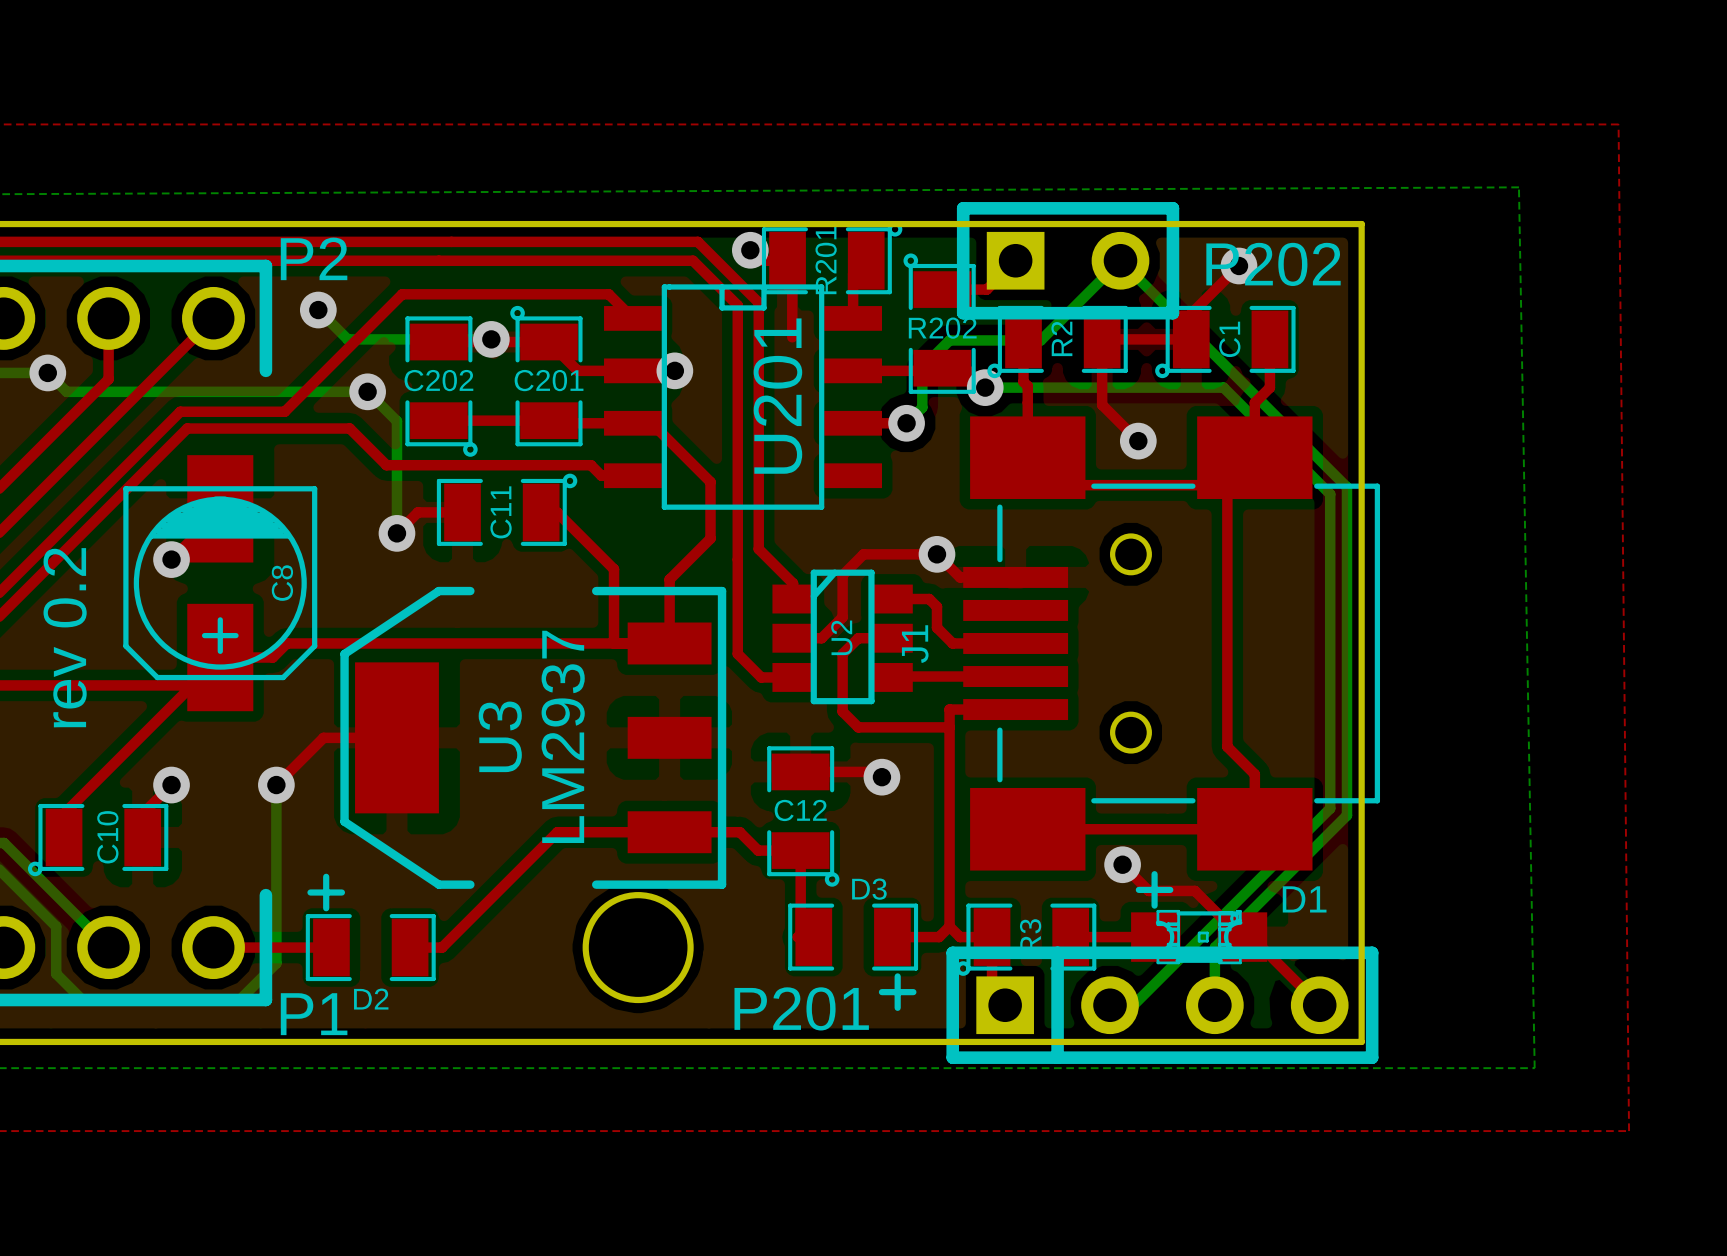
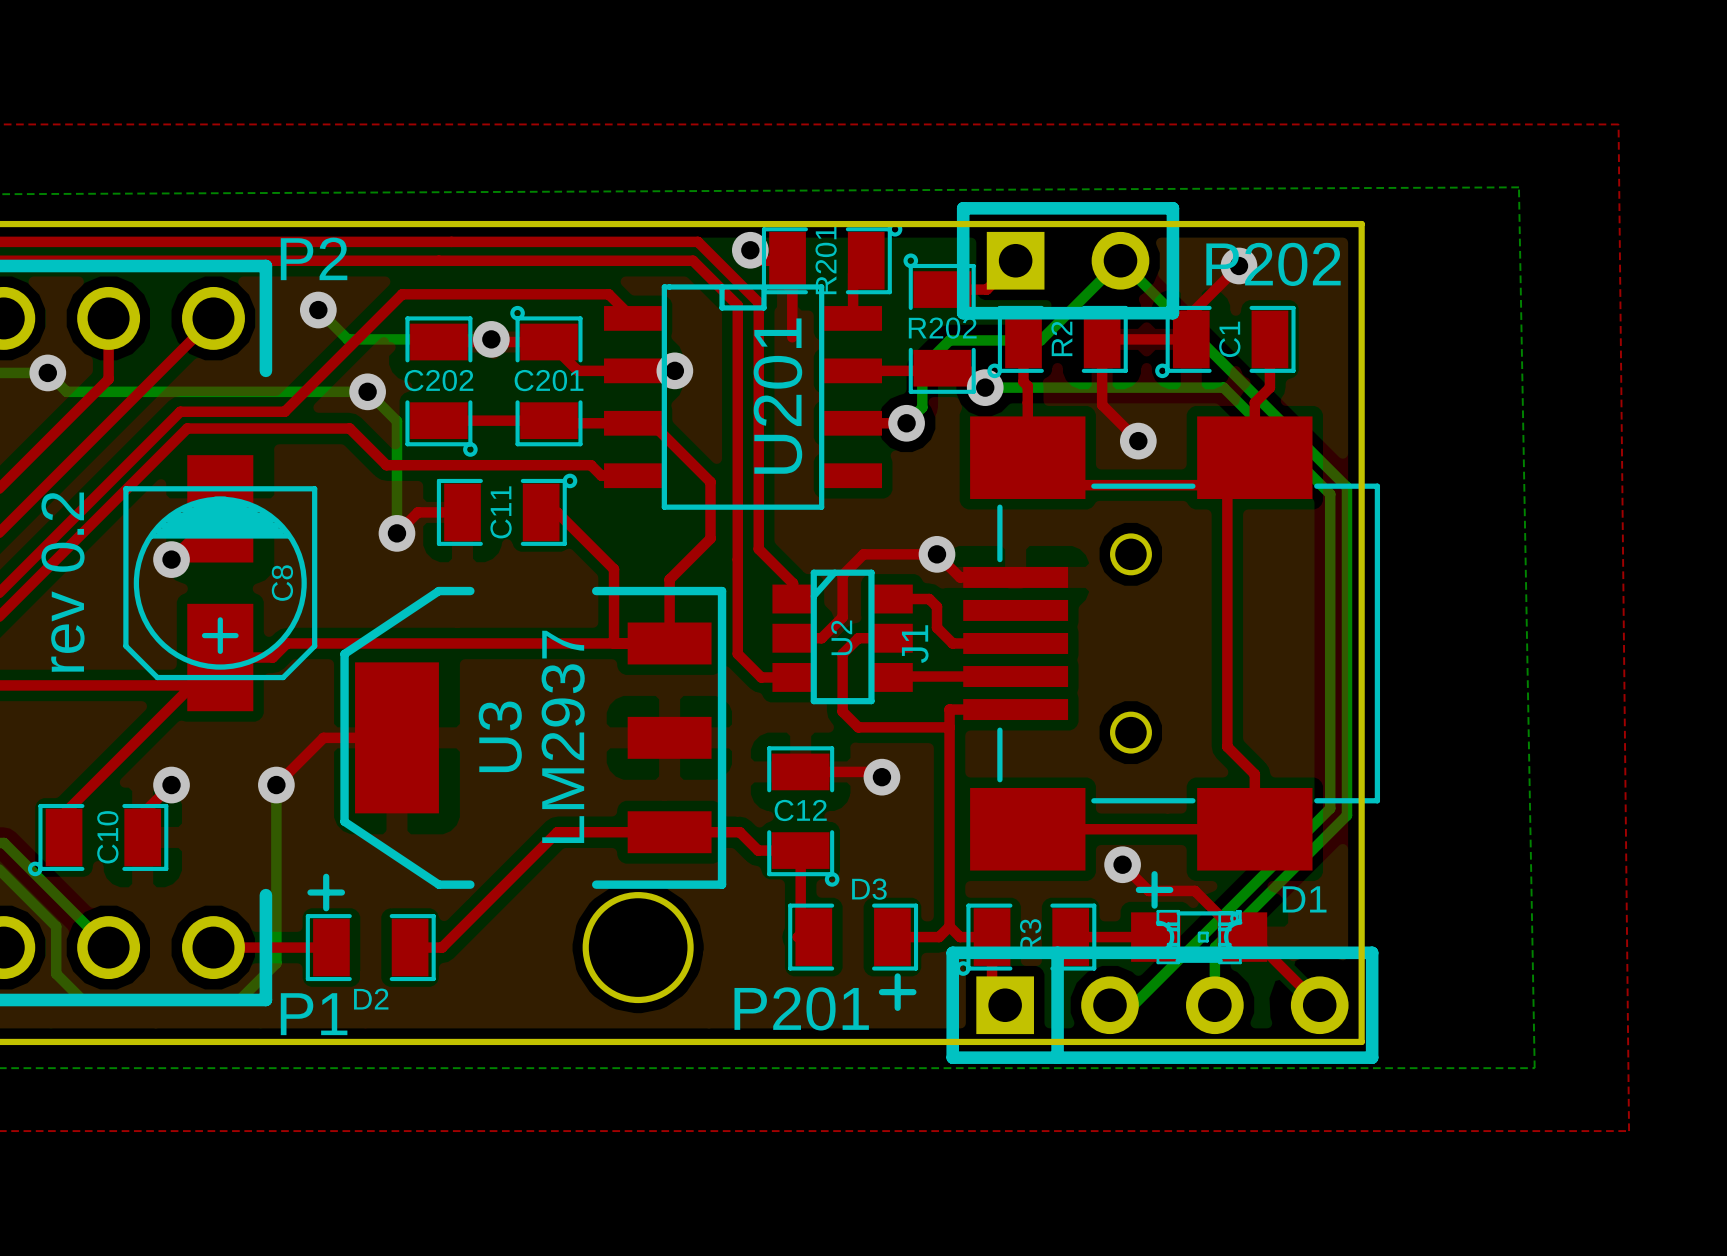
text position: rev 0.2 (65, 637) -> rev 0.2 (63, 582)

